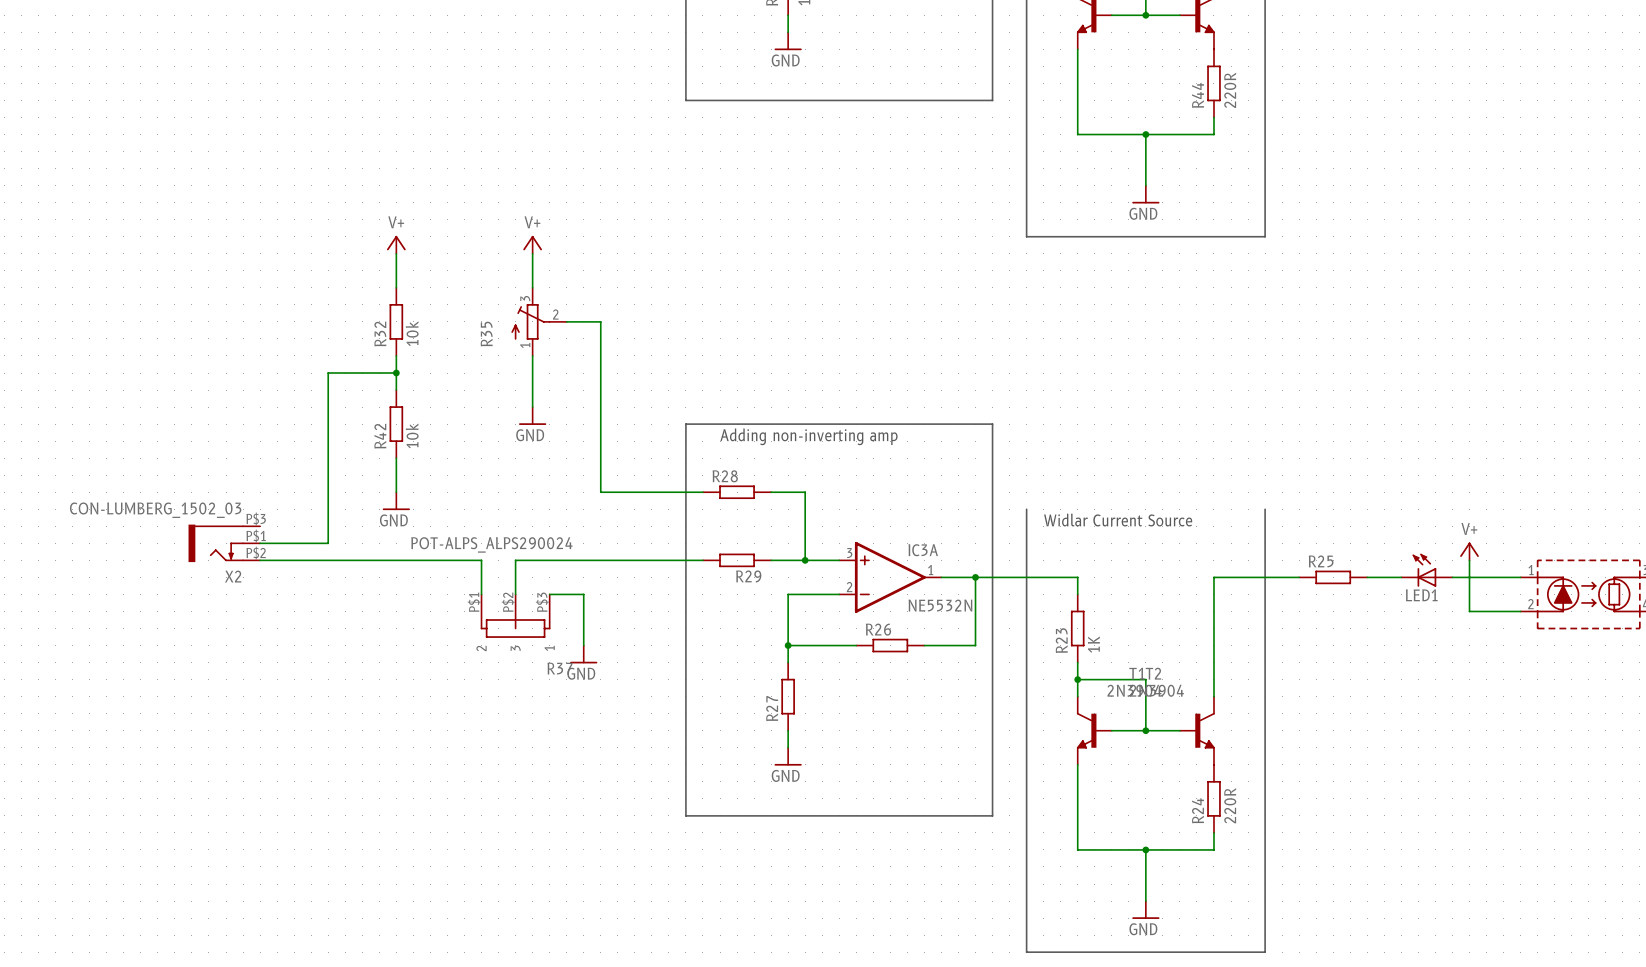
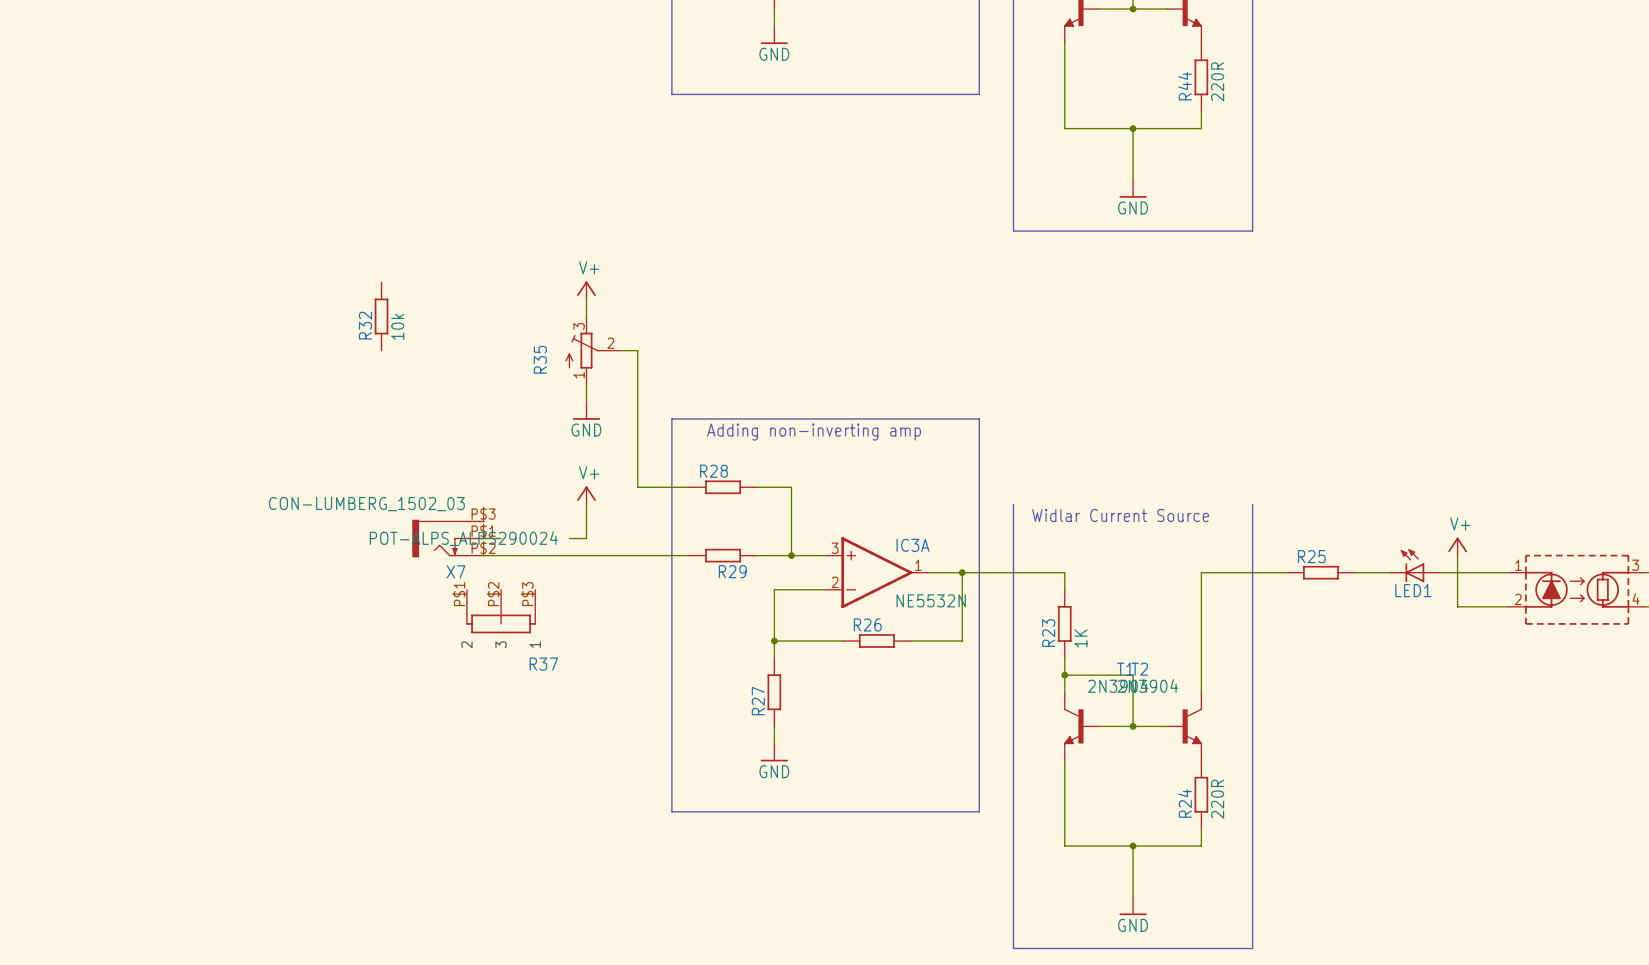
power symbol: V+ (396, 244) -> none
power symbol position: V+ (532, 244) -> V+ (586, 290)
wire: (396, 253) (396, 287) -> none
wire: (532, 253) (532, 287) -> none
wire: none -> (586, 299) (586, 316)
R35 position: (539, 321) -> (593, 350)
wire: (566, 321) (600, 321) (600, 390) -> none
wire: (396, 355) (396, 390) -> none
wire: (532, 355) (532, 407) -> none
wire: (396, 373) (328, 373) (328, 543) (260, 543) -> none
junction: (396, 373) -> none
wire: (600, 407) (600, 492) (651, 492) -> (620, 350) (637, 350) (637, 487)
power symbol position: GND (532, 416) -> GND (586, 410)
R42: 10k (396, 424) -> none
wire: (396, 458) (396, 492) -> none
power symbol: none -> V+ (586, 495)
power symbol: GND (396, 501) -> none
wire: none -> (586, 504) (586, 538) (569, 538)
X2: CON-LUMBERG_1502_03 (224, 543) -> none
X7: none -> CON-LUMBERG_1502_03 (448, 538)
wire: none -> (484, 538) (501, 538)
wire: (260, 560) (481, 560) (481, 594) -> none
wire: (515, 560) (515, 594) -> (501, 555) (484, 555)
wire: (549, 594) (583, 594) (583, 645) -> none
power symbol: GND (583, 654) -> none

